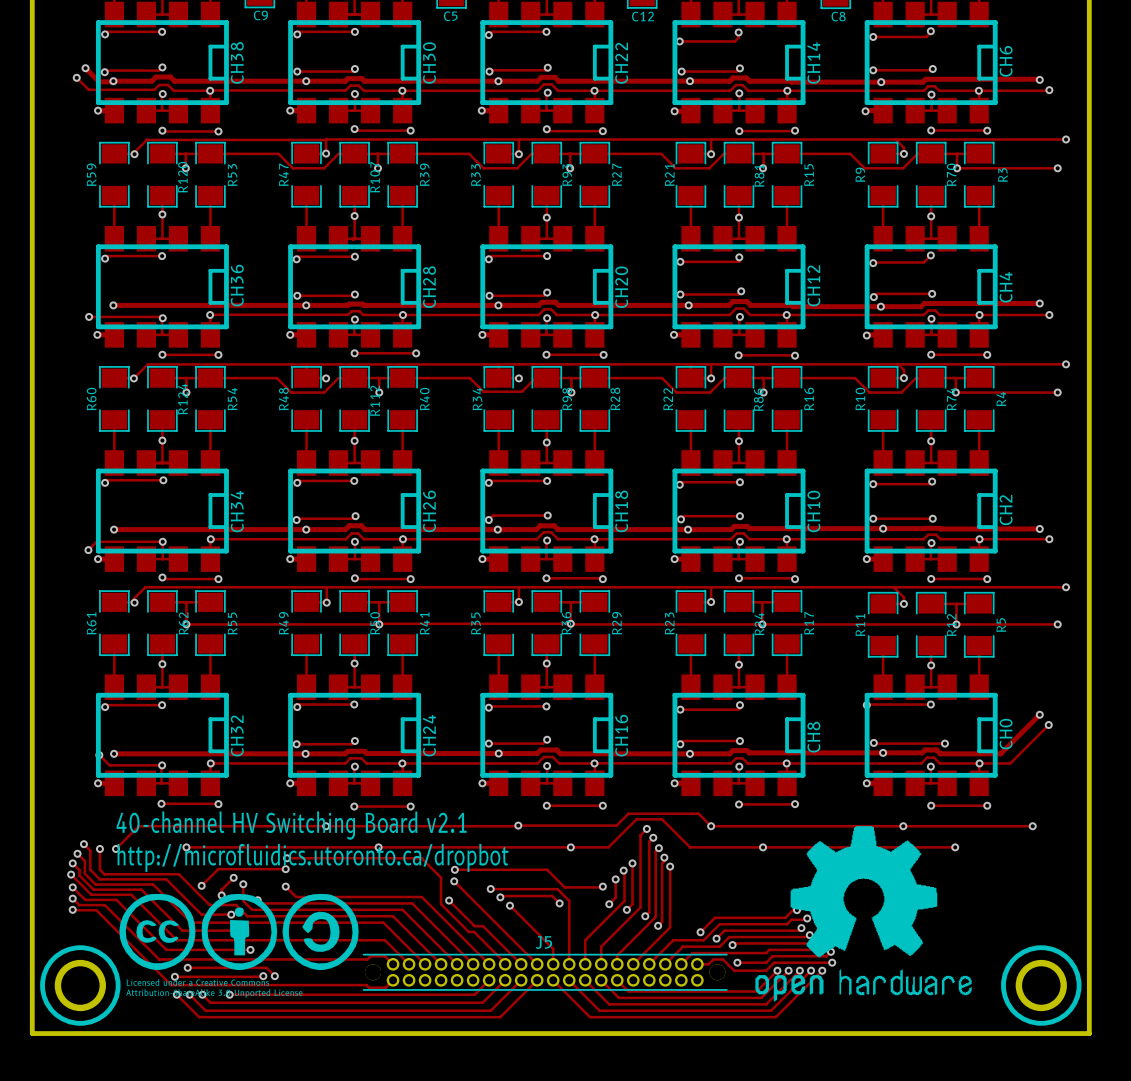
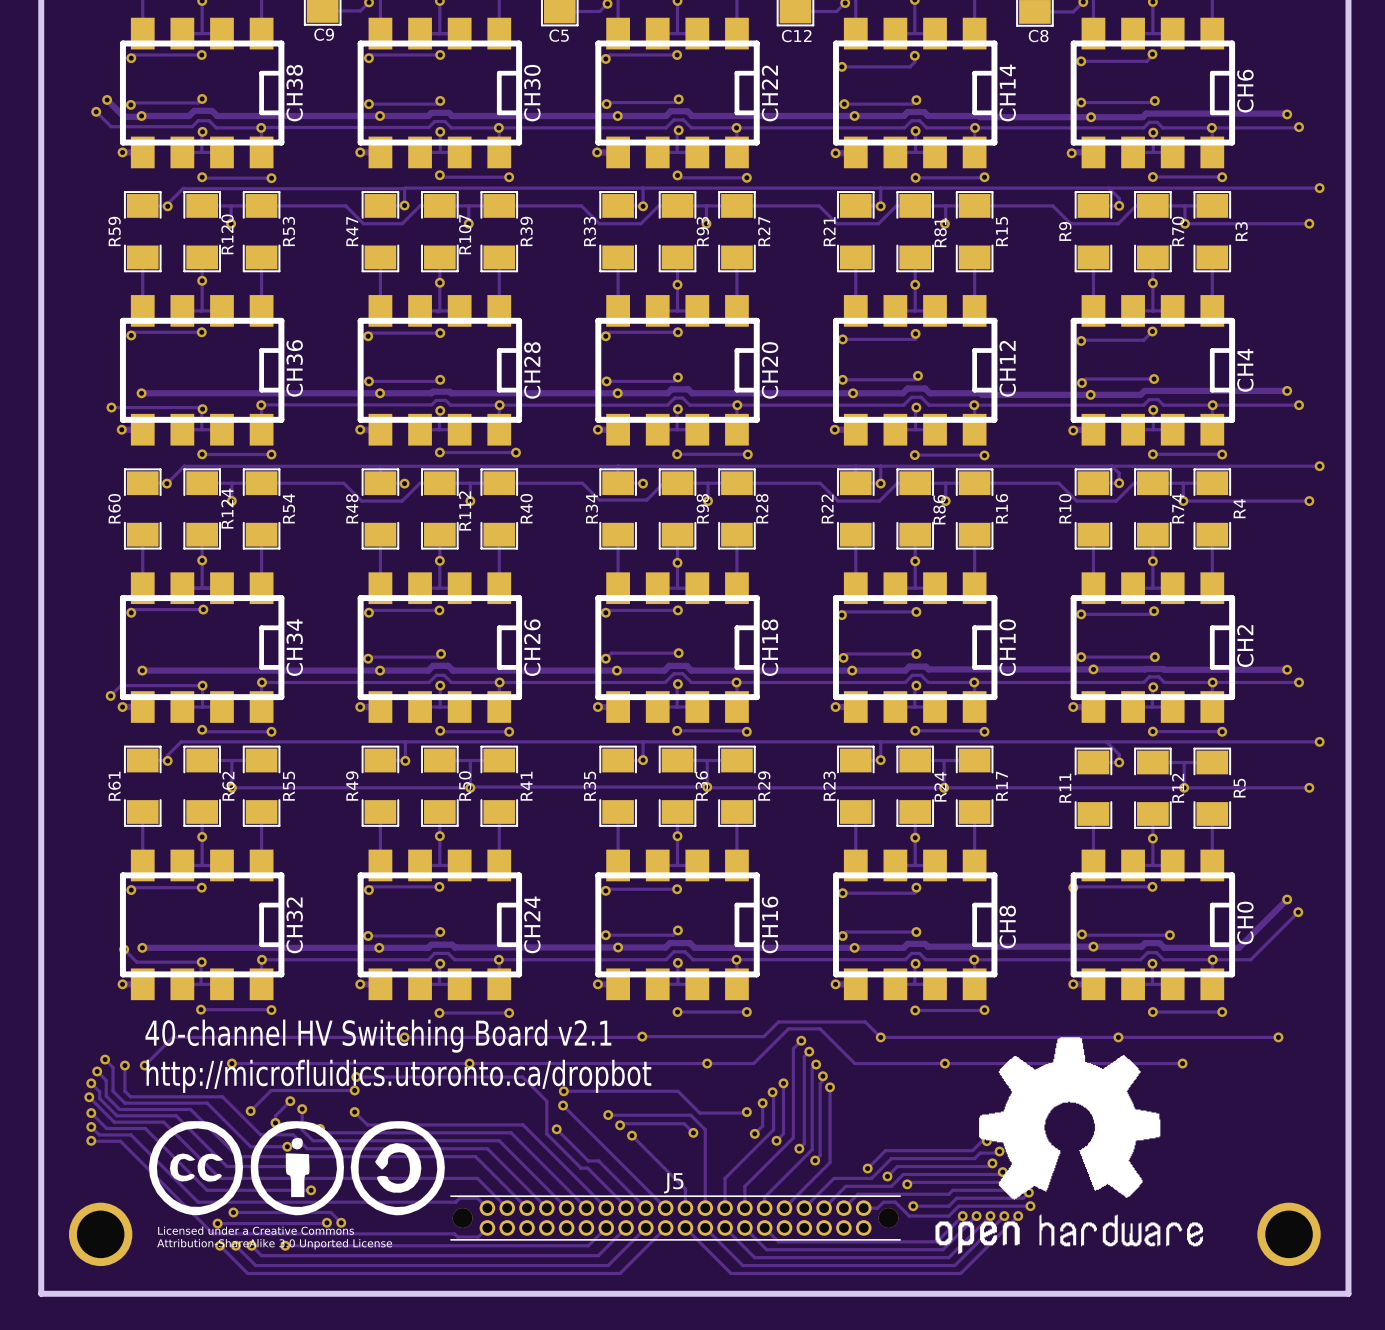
part footprint: [40, 945, 121, 1026] -> [68, 1202, 133, 1267]
part footprint: [1001, 945, 1082, 1026] -> [1257, 1202, 1321, 1267]

